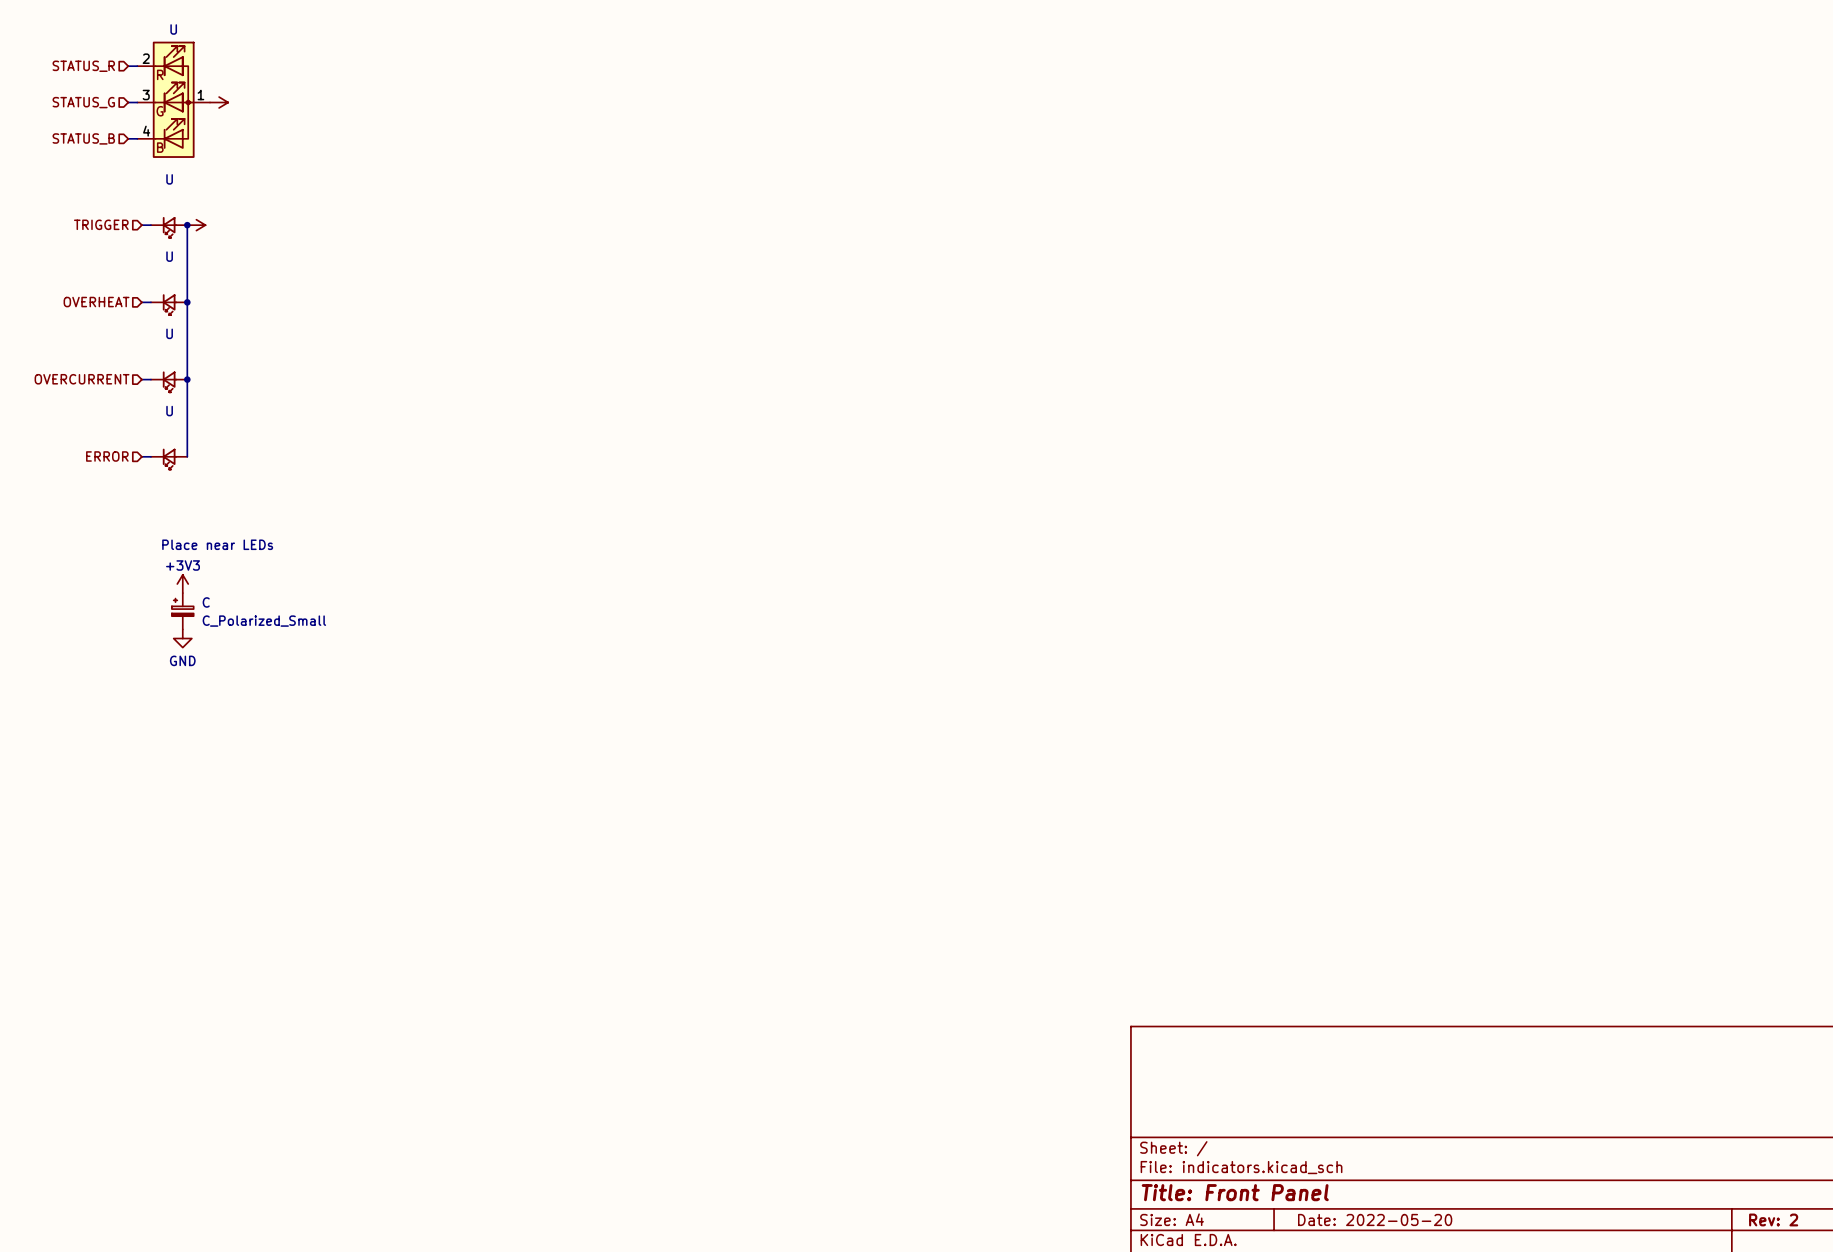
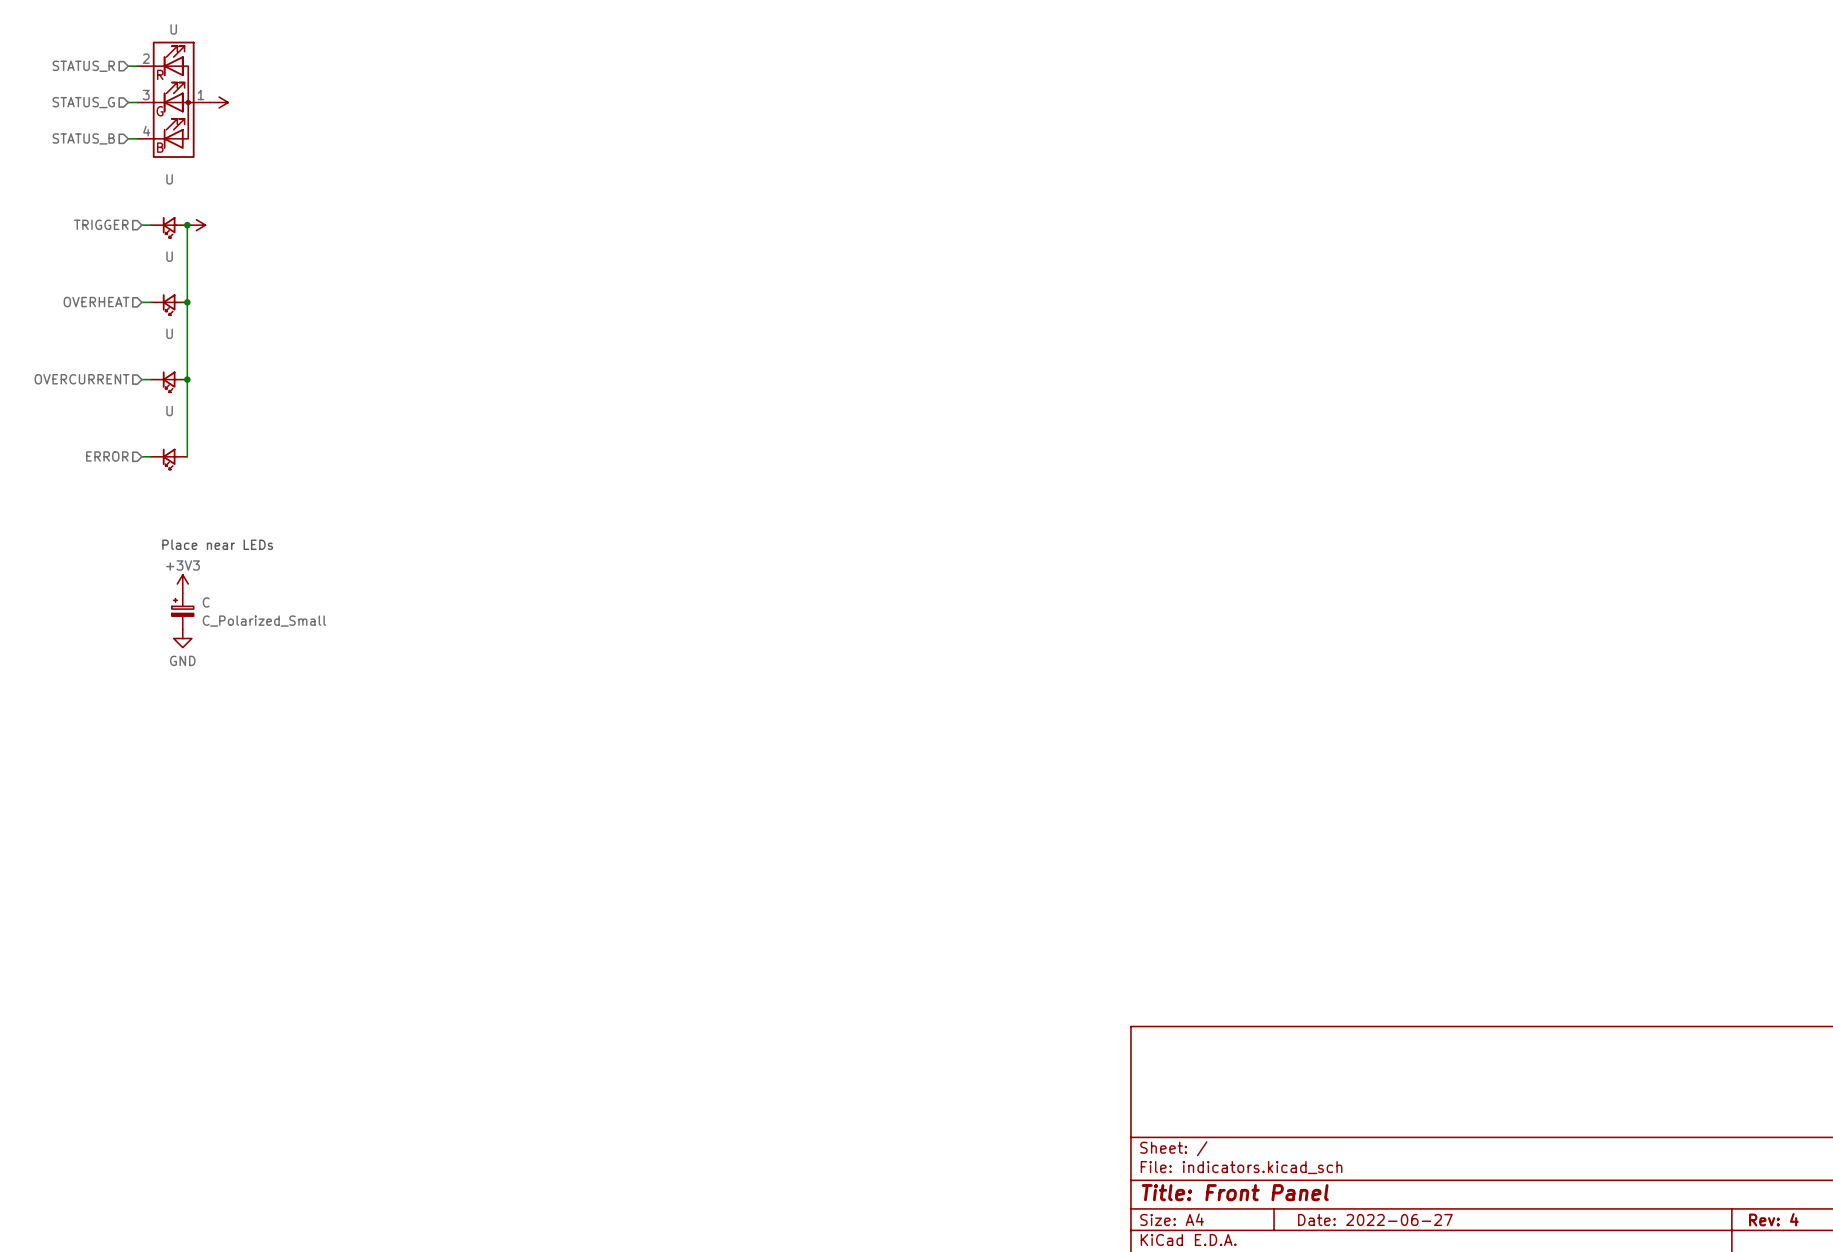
title block: Date: 2022-05-20 (1375, 1219) -> Date: 2022-06-27 (1375, 1219)
title block: Rev: 2 (1773, 1219) -> Rev: 4 (1773, 1219)

